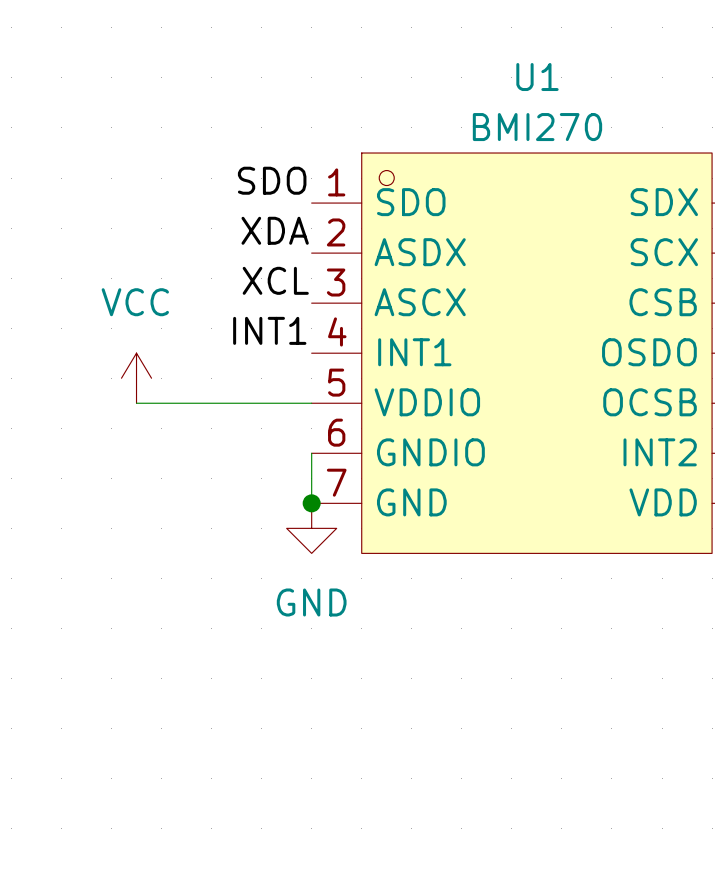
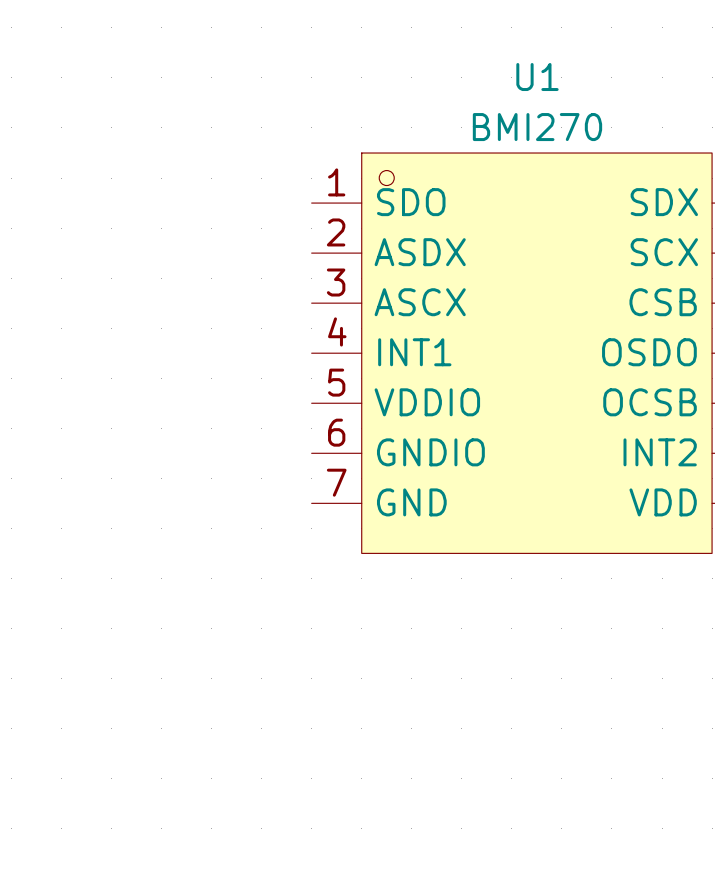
label: SDO (272, 180) -> none
label: XDA (275, 230) -> none
label: XCL (275, 280) -> none
label: INT1 (269, 330) -> none
power symbol: VCC (136, 378) -> none
wire: (136, 403) (311, 403) -> none
wire: (311, 453) (311, 503) -> none
junction: (311, 503) -> none
power symbol: GND (311, 528) -> none

